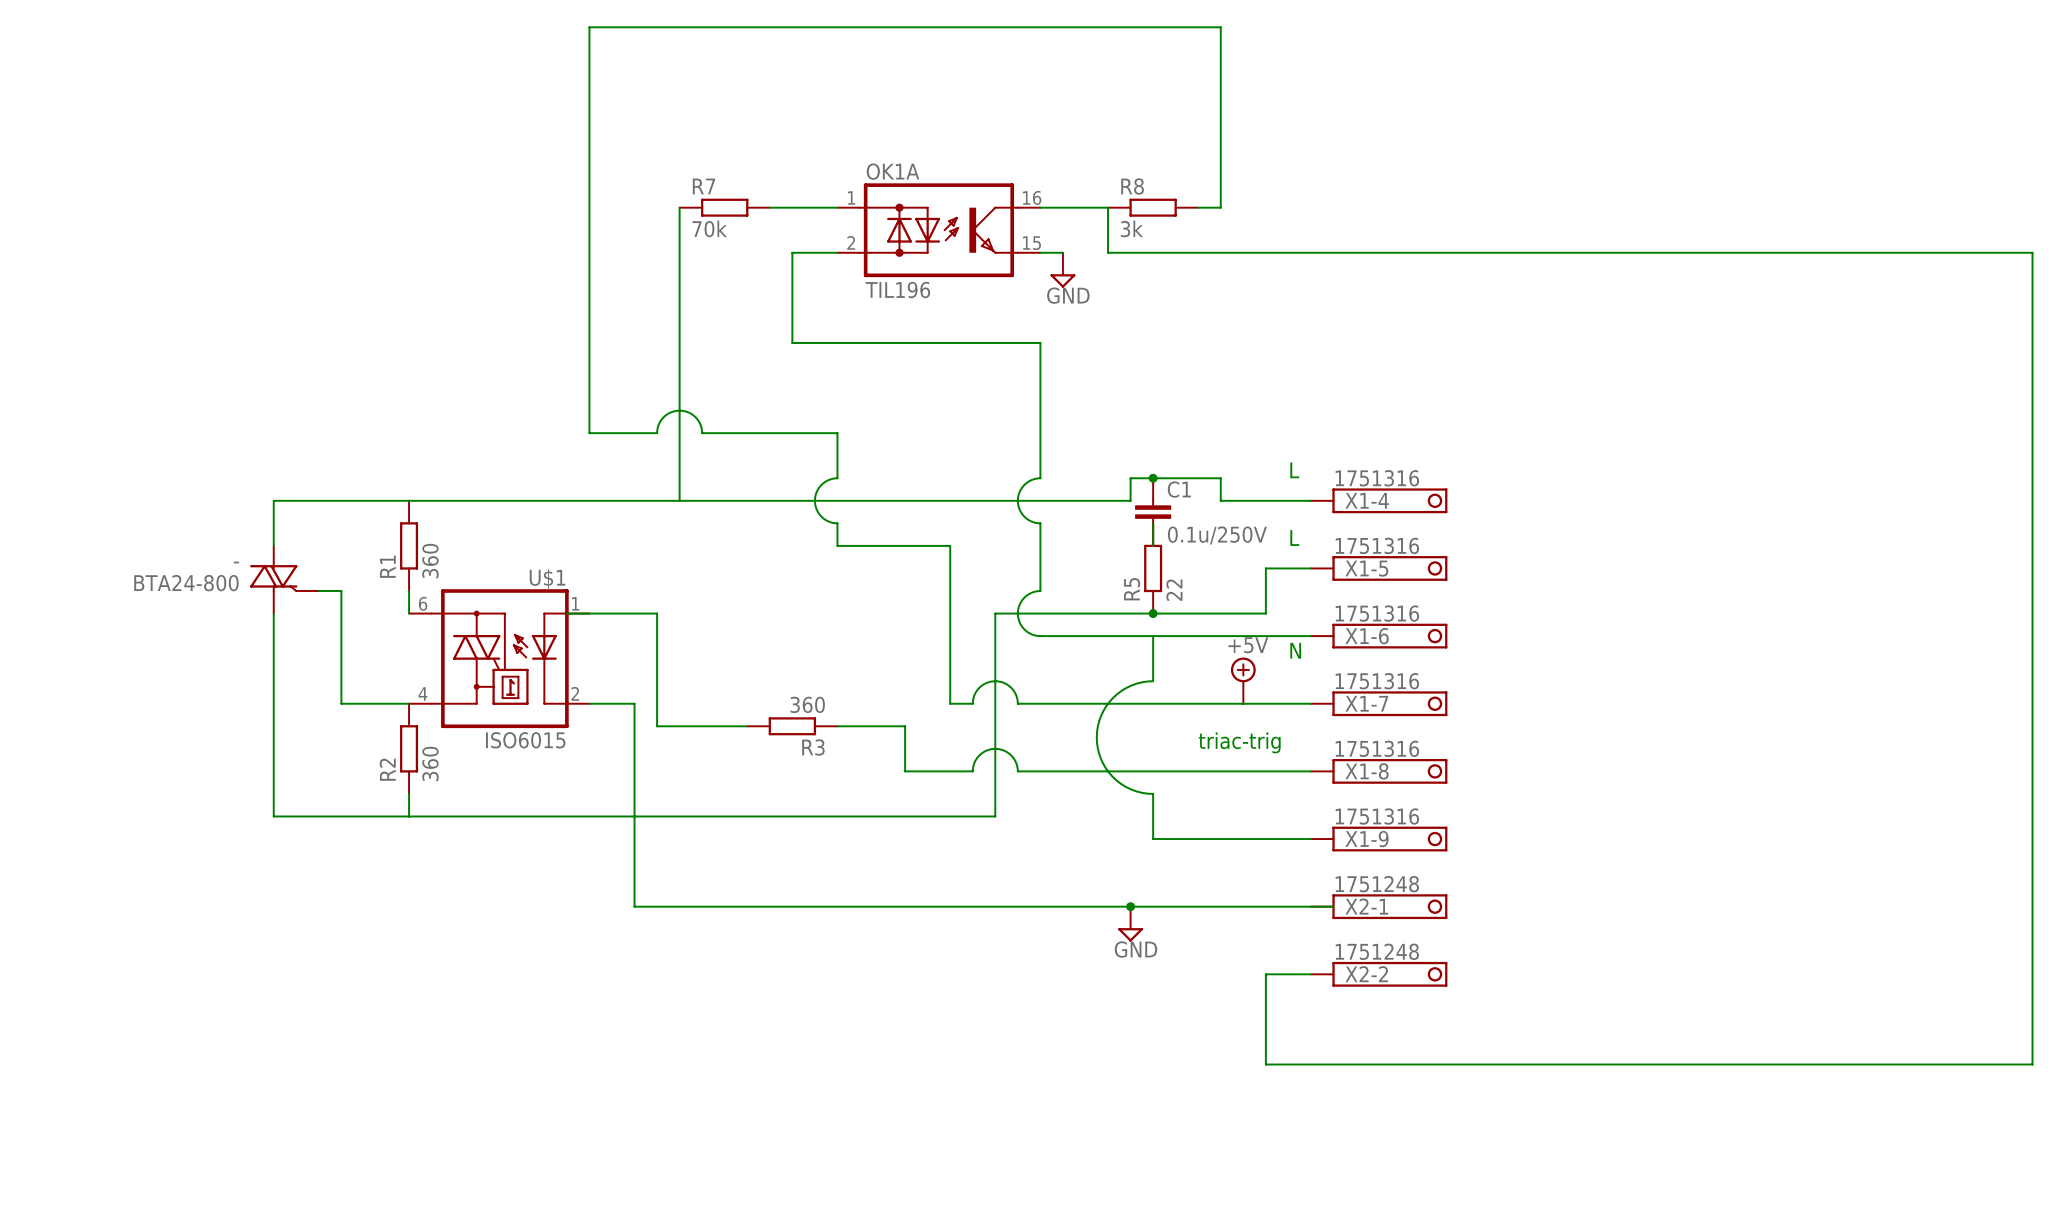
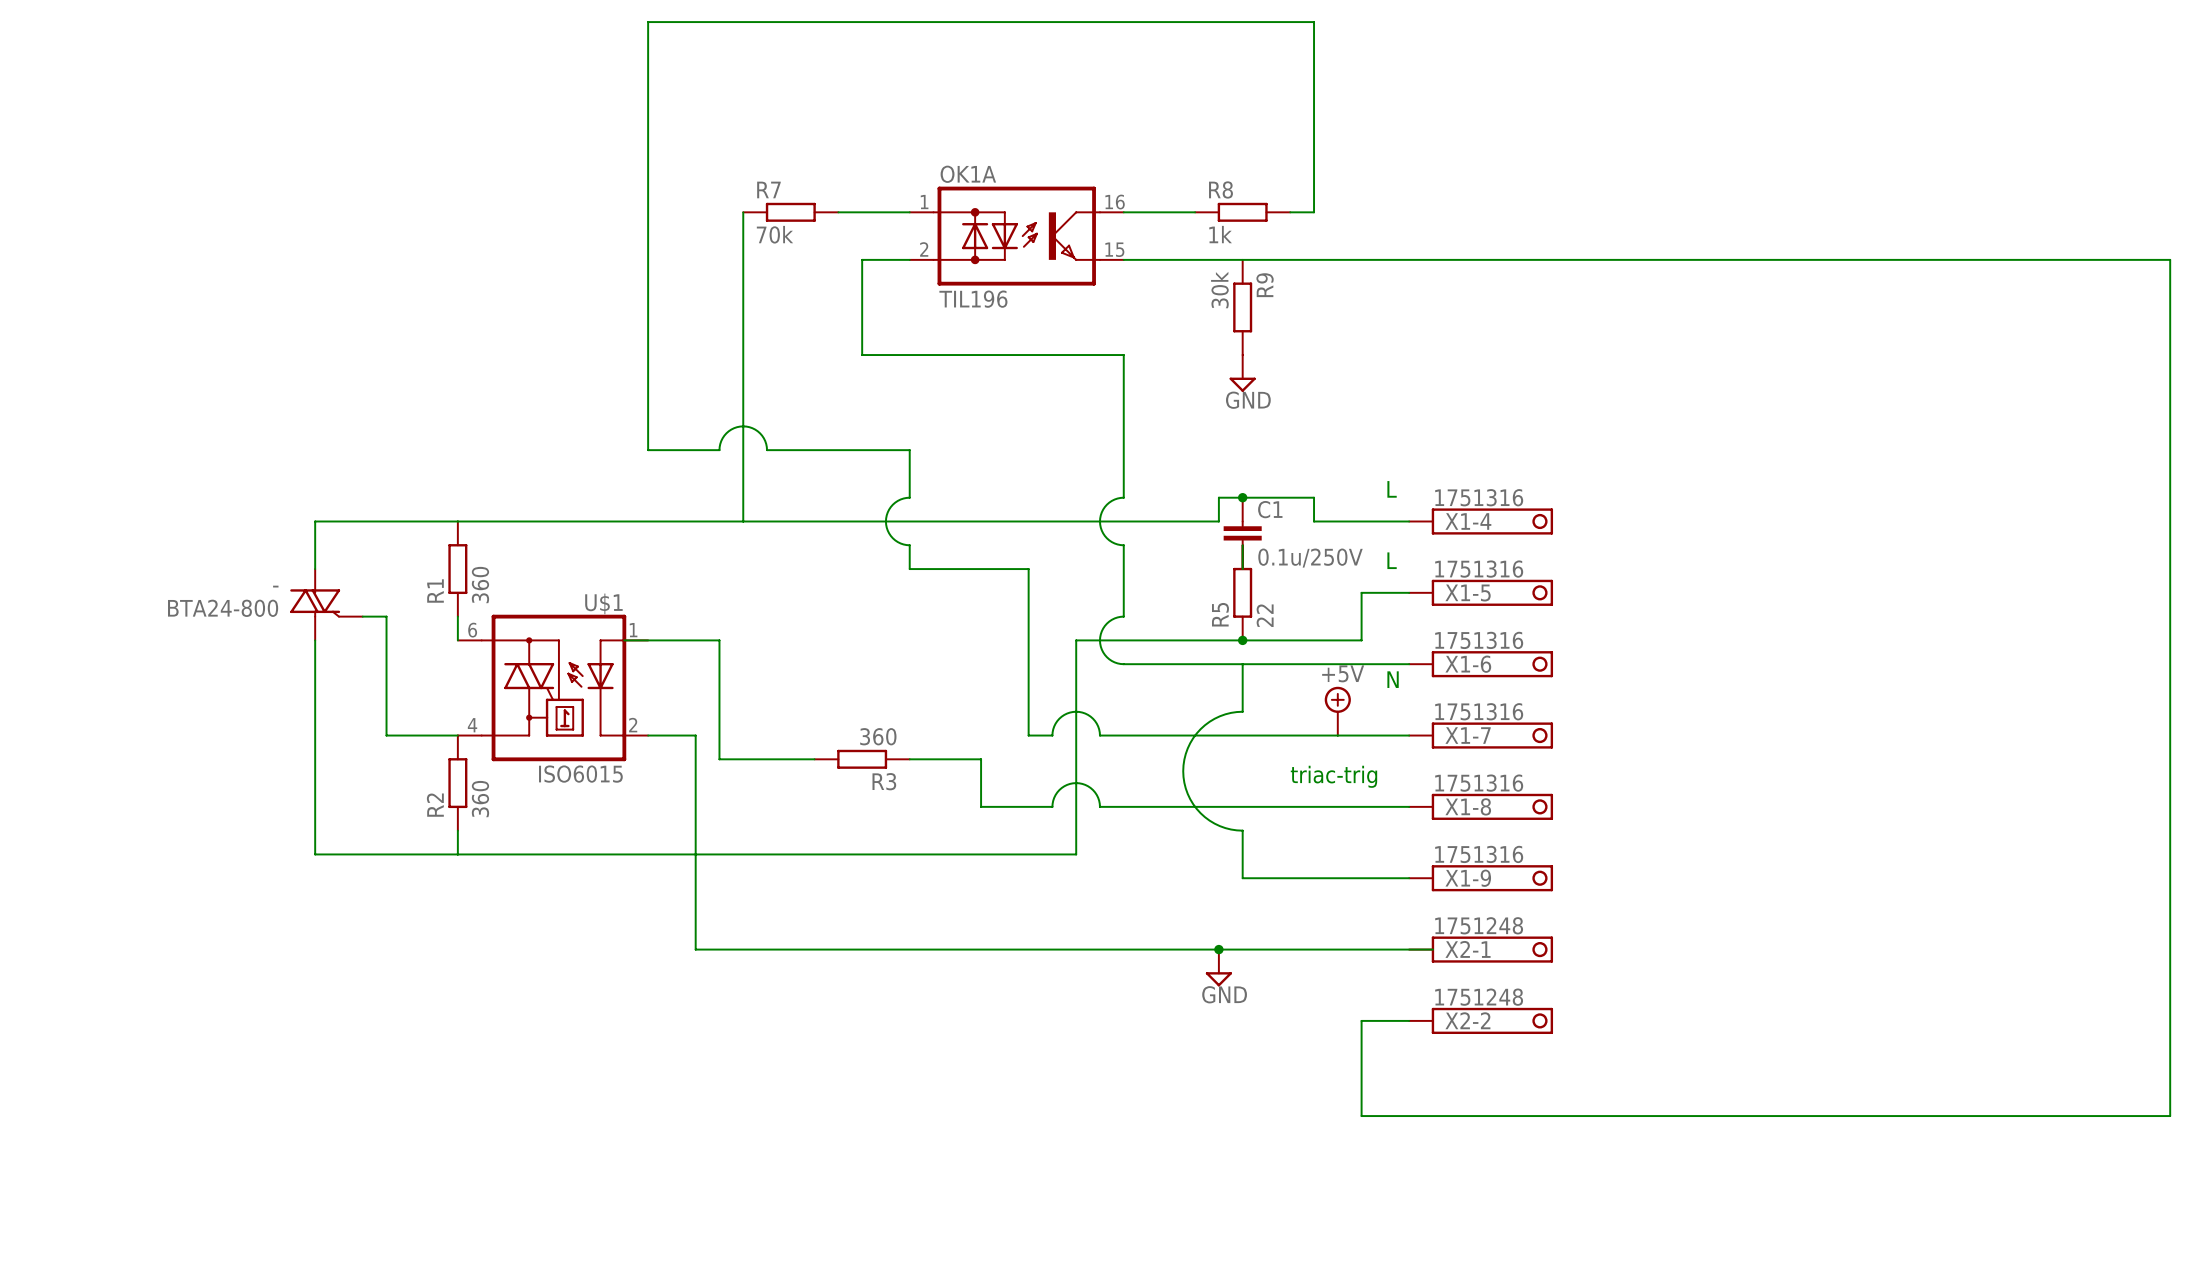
wire: (1108, 207) (1108, 252) -> (1147, 259) (1195, 259)
R8 value: 3k (1131, 228) -> 1k (1220, 234)
power symbol position: GND (1062, 270) -> GND (1242, 373)
R9: none -> 30k (1242, 307)

